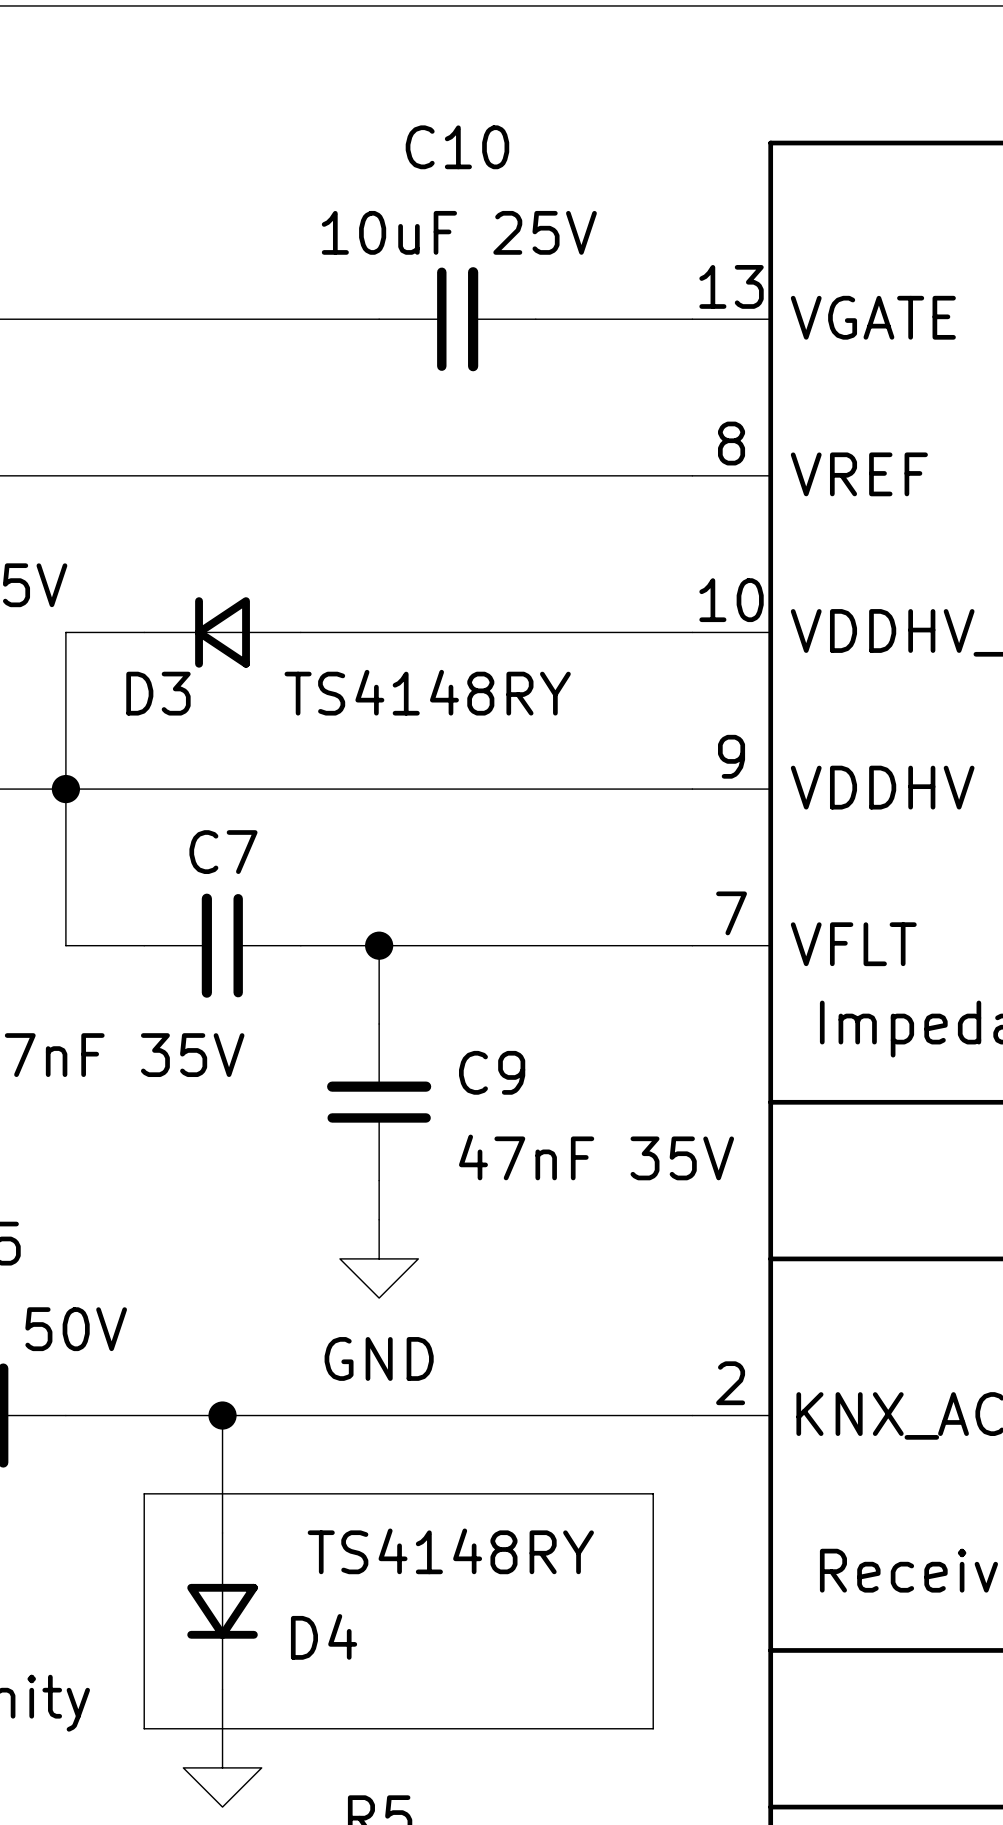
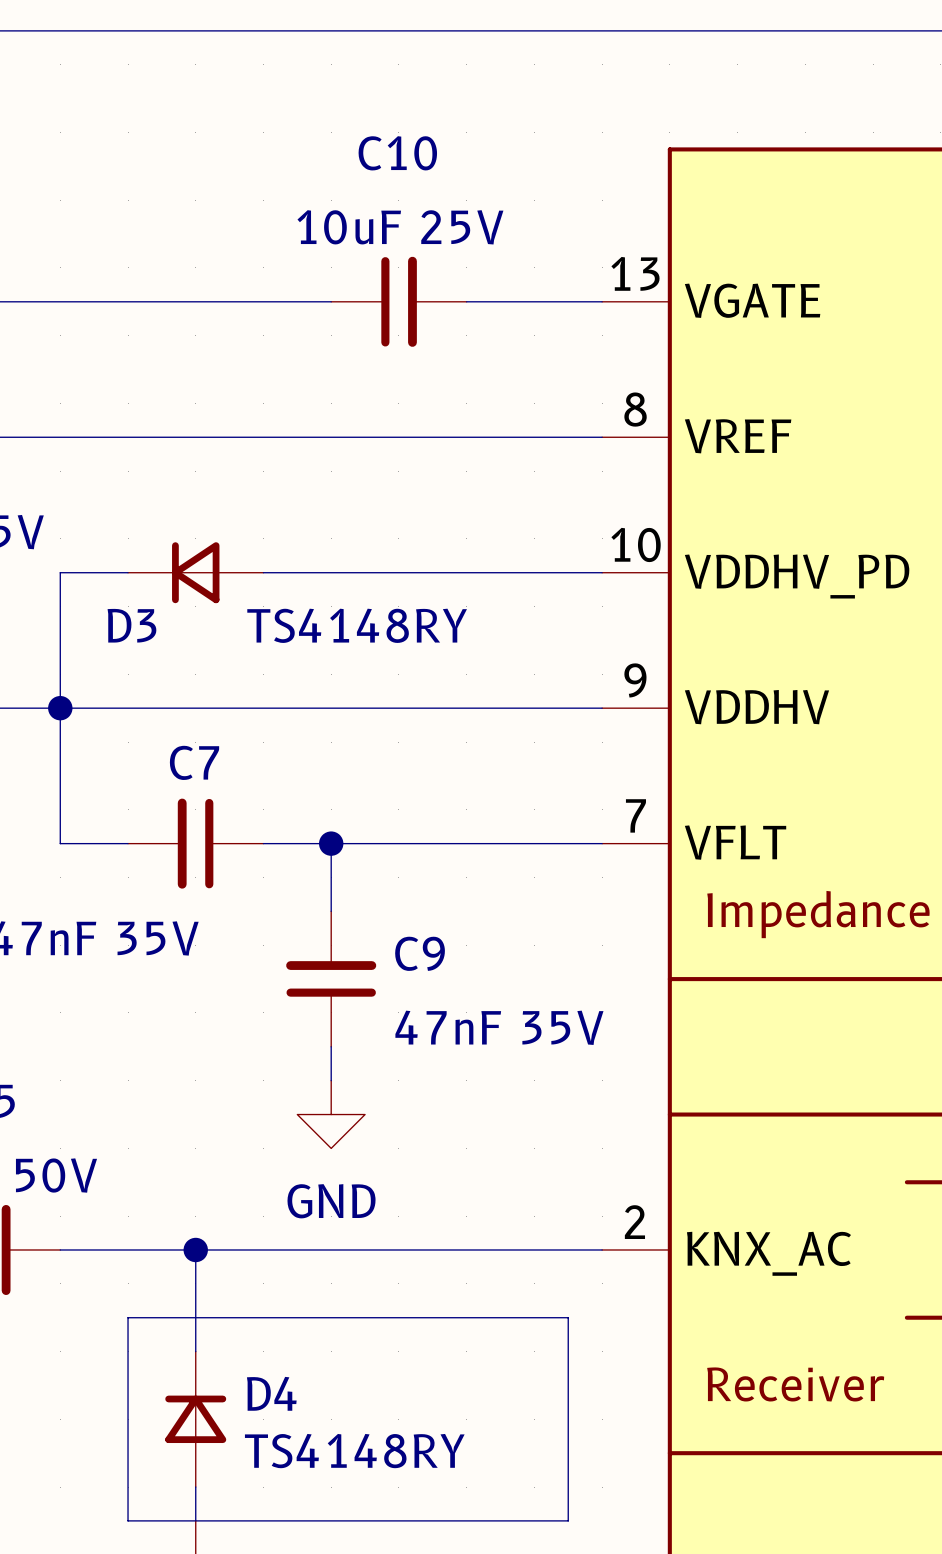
D4 value position: TS4148RY (450, 1551) -> TS4148RY (354, 1451)
D4 rotation: 0° (222, 1611) -> 180° (195, 1419)

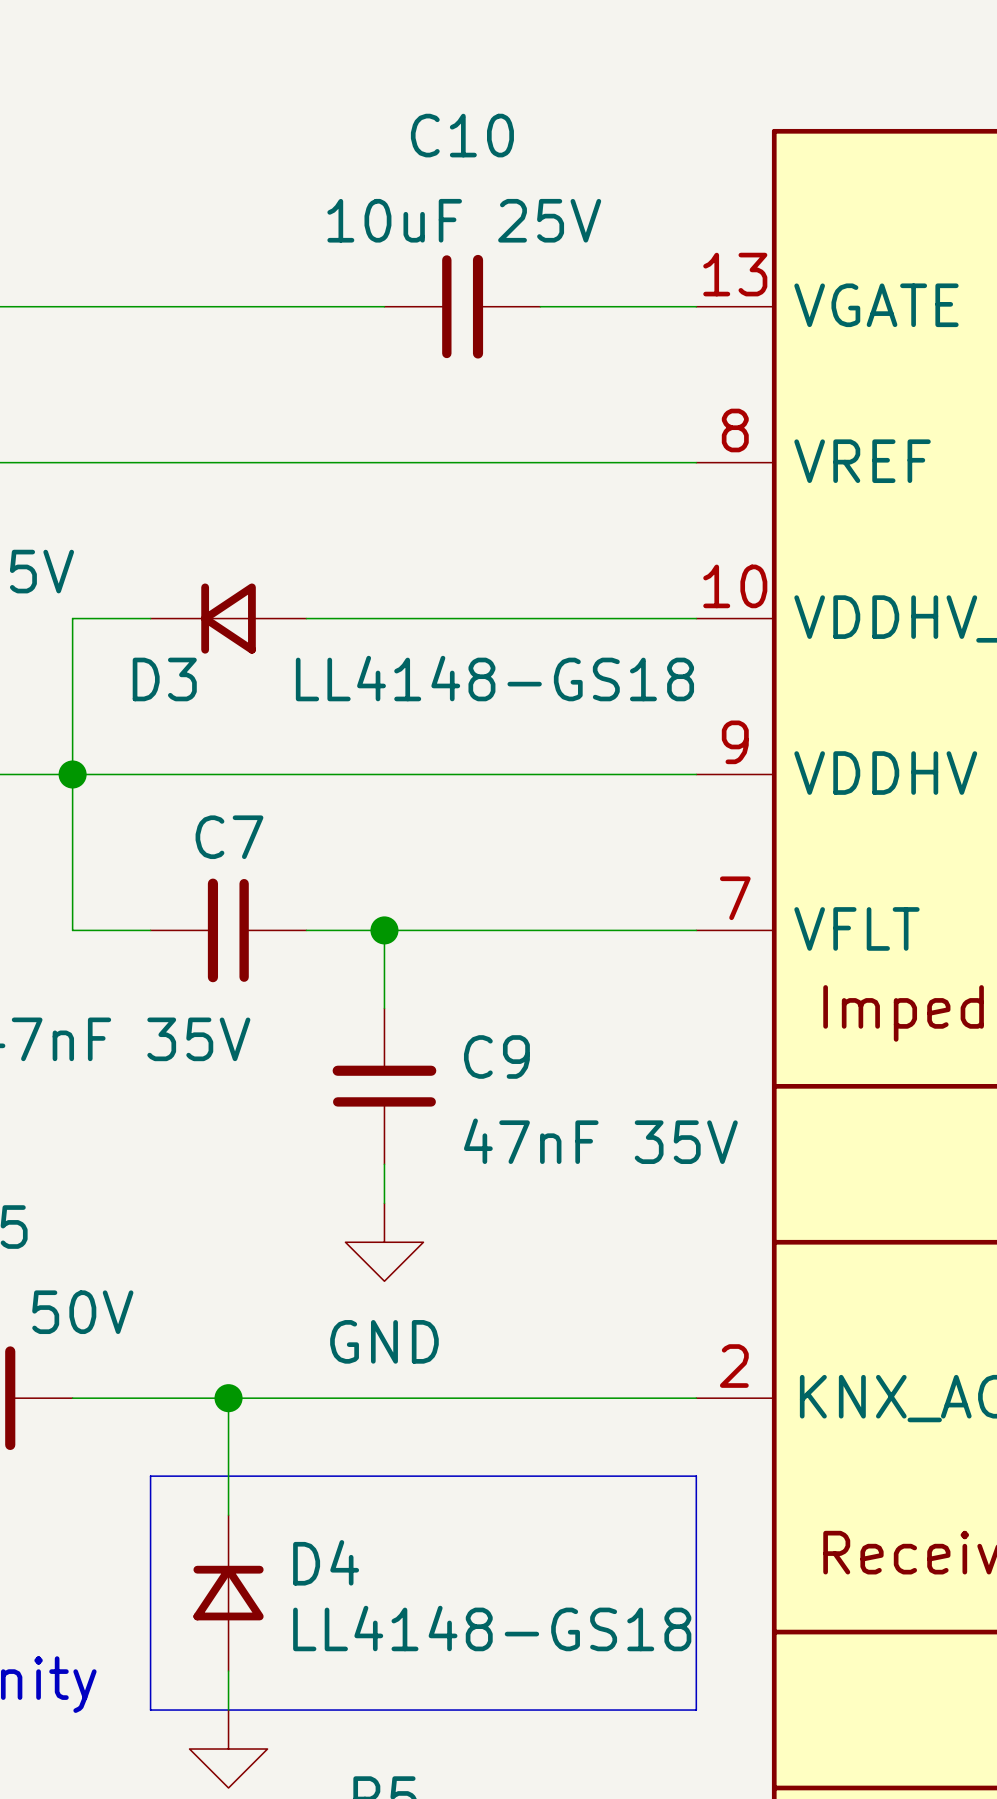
D3 value: TS4148RY (357, 625) -> LL4148-GS18 (494, 678)
line: (568, 1317) (568, 1520) -> (657, 1476) (696, 1476) (696, 1710) (657, 1710)
D4 value: TS4148RY (354, 1451) -> LL4148-GS18 (492, 1628)

